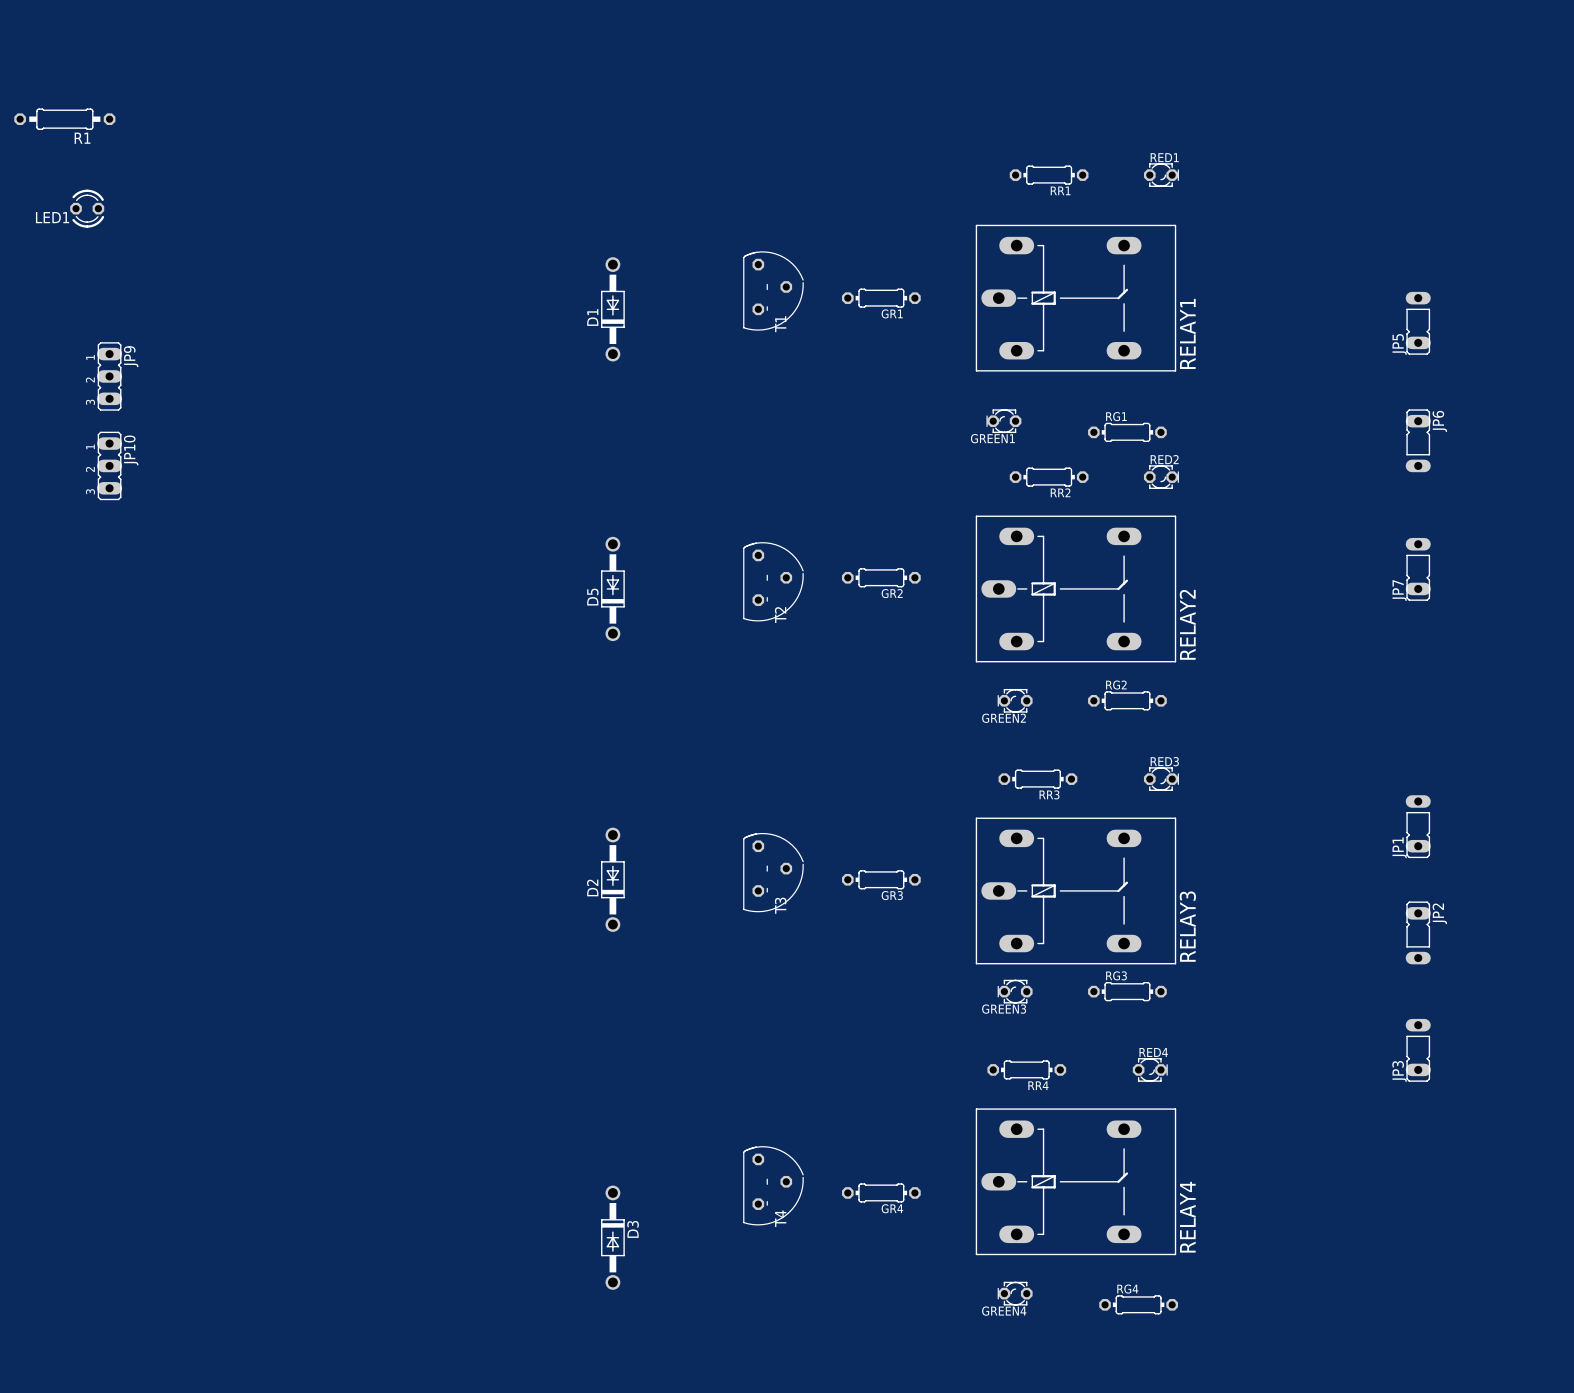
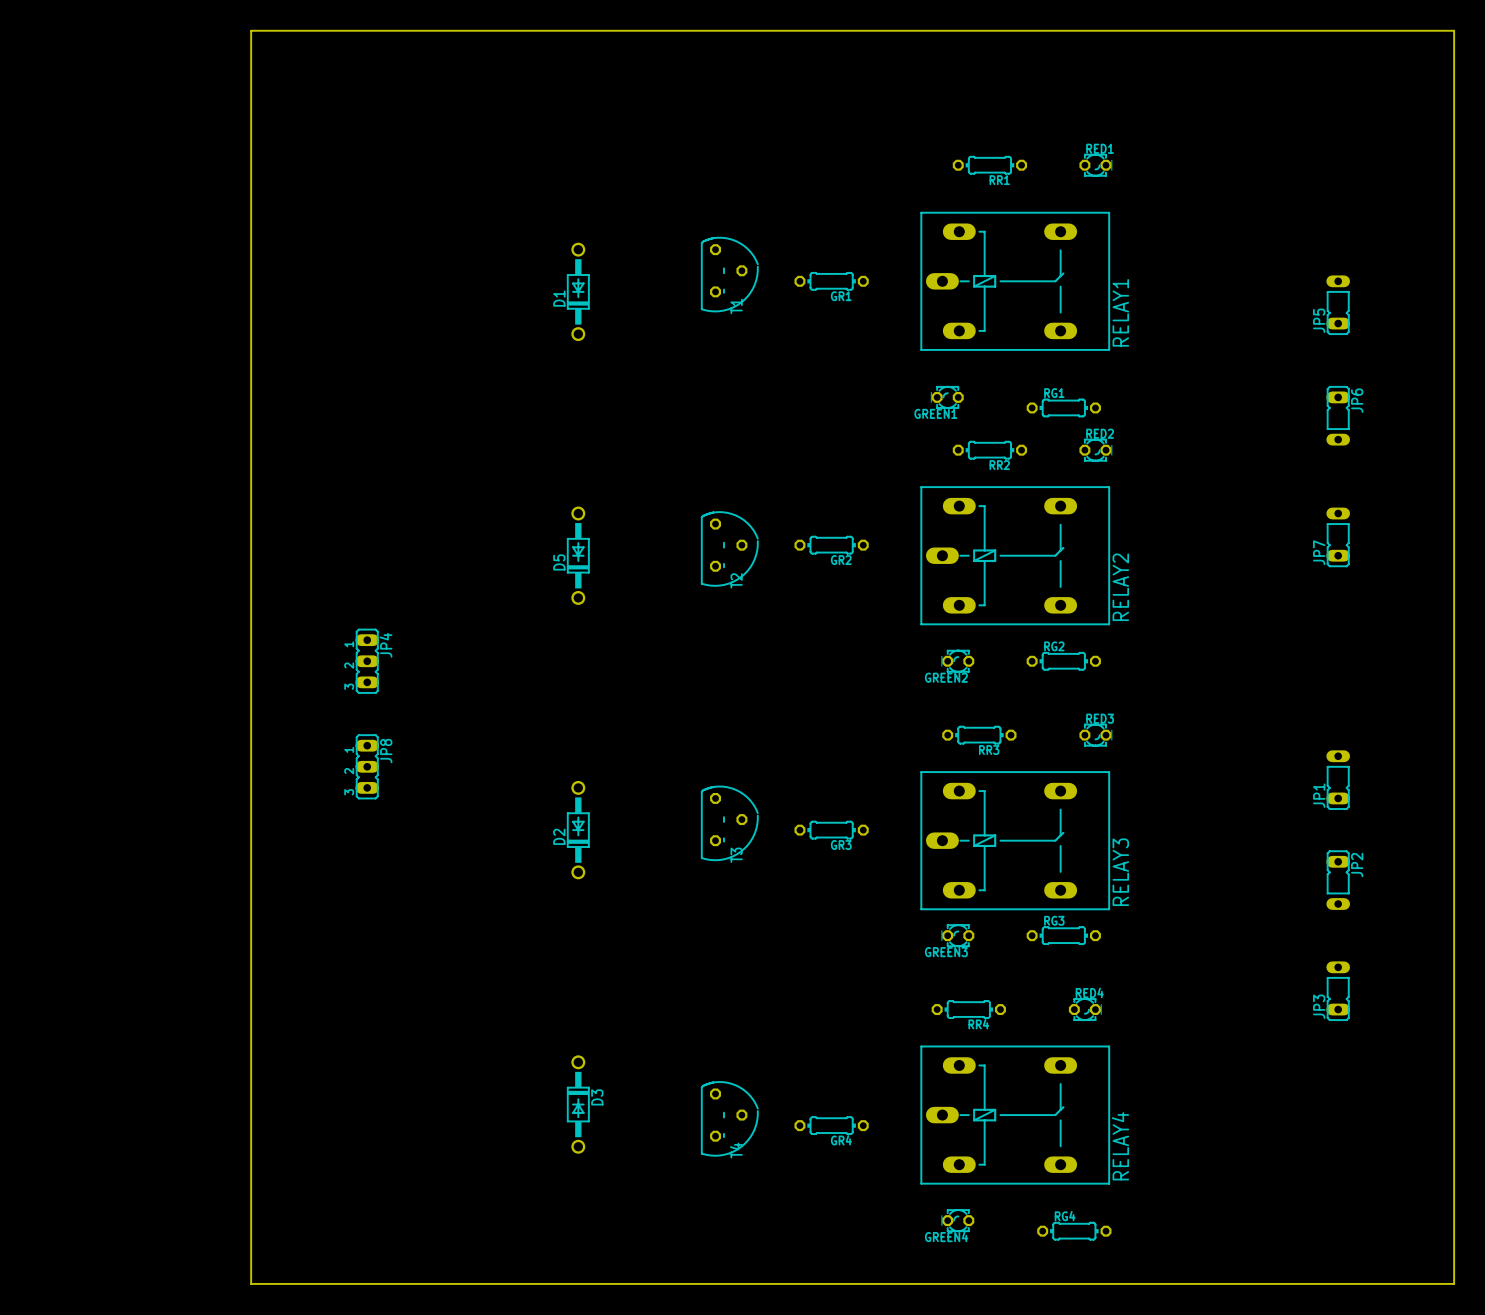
board edge: none -> (251, 30) (1454, 30) (1454, 1283) (251, 1283) (251, 30)
R1: (64, 119) -> none
LED1: (87, 208) -> none
JP9: (109, 376) -> none
JP10: (109, 465) -> none
JP4: none -> (367, 661)
JP8: none -> (367, 766)
D3 position: (612, 1237) -> (578, 1104)

